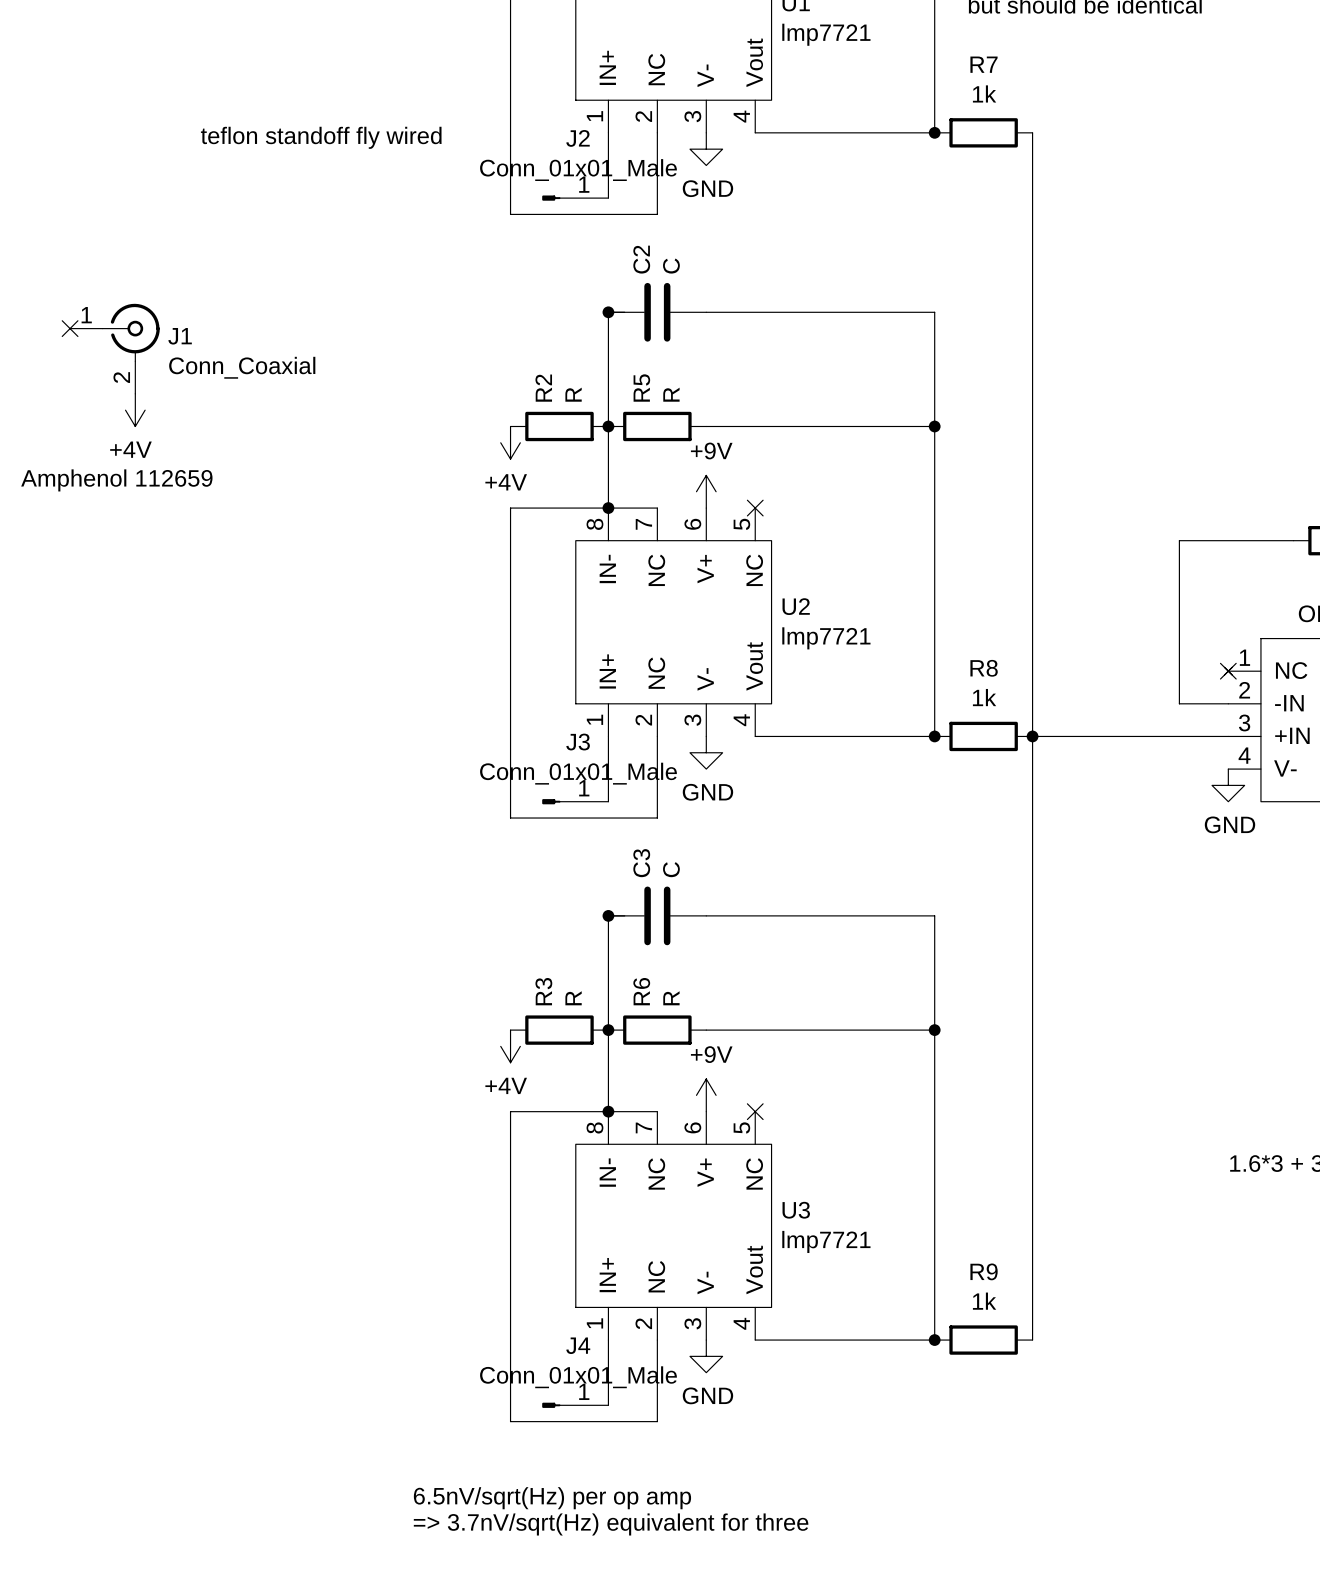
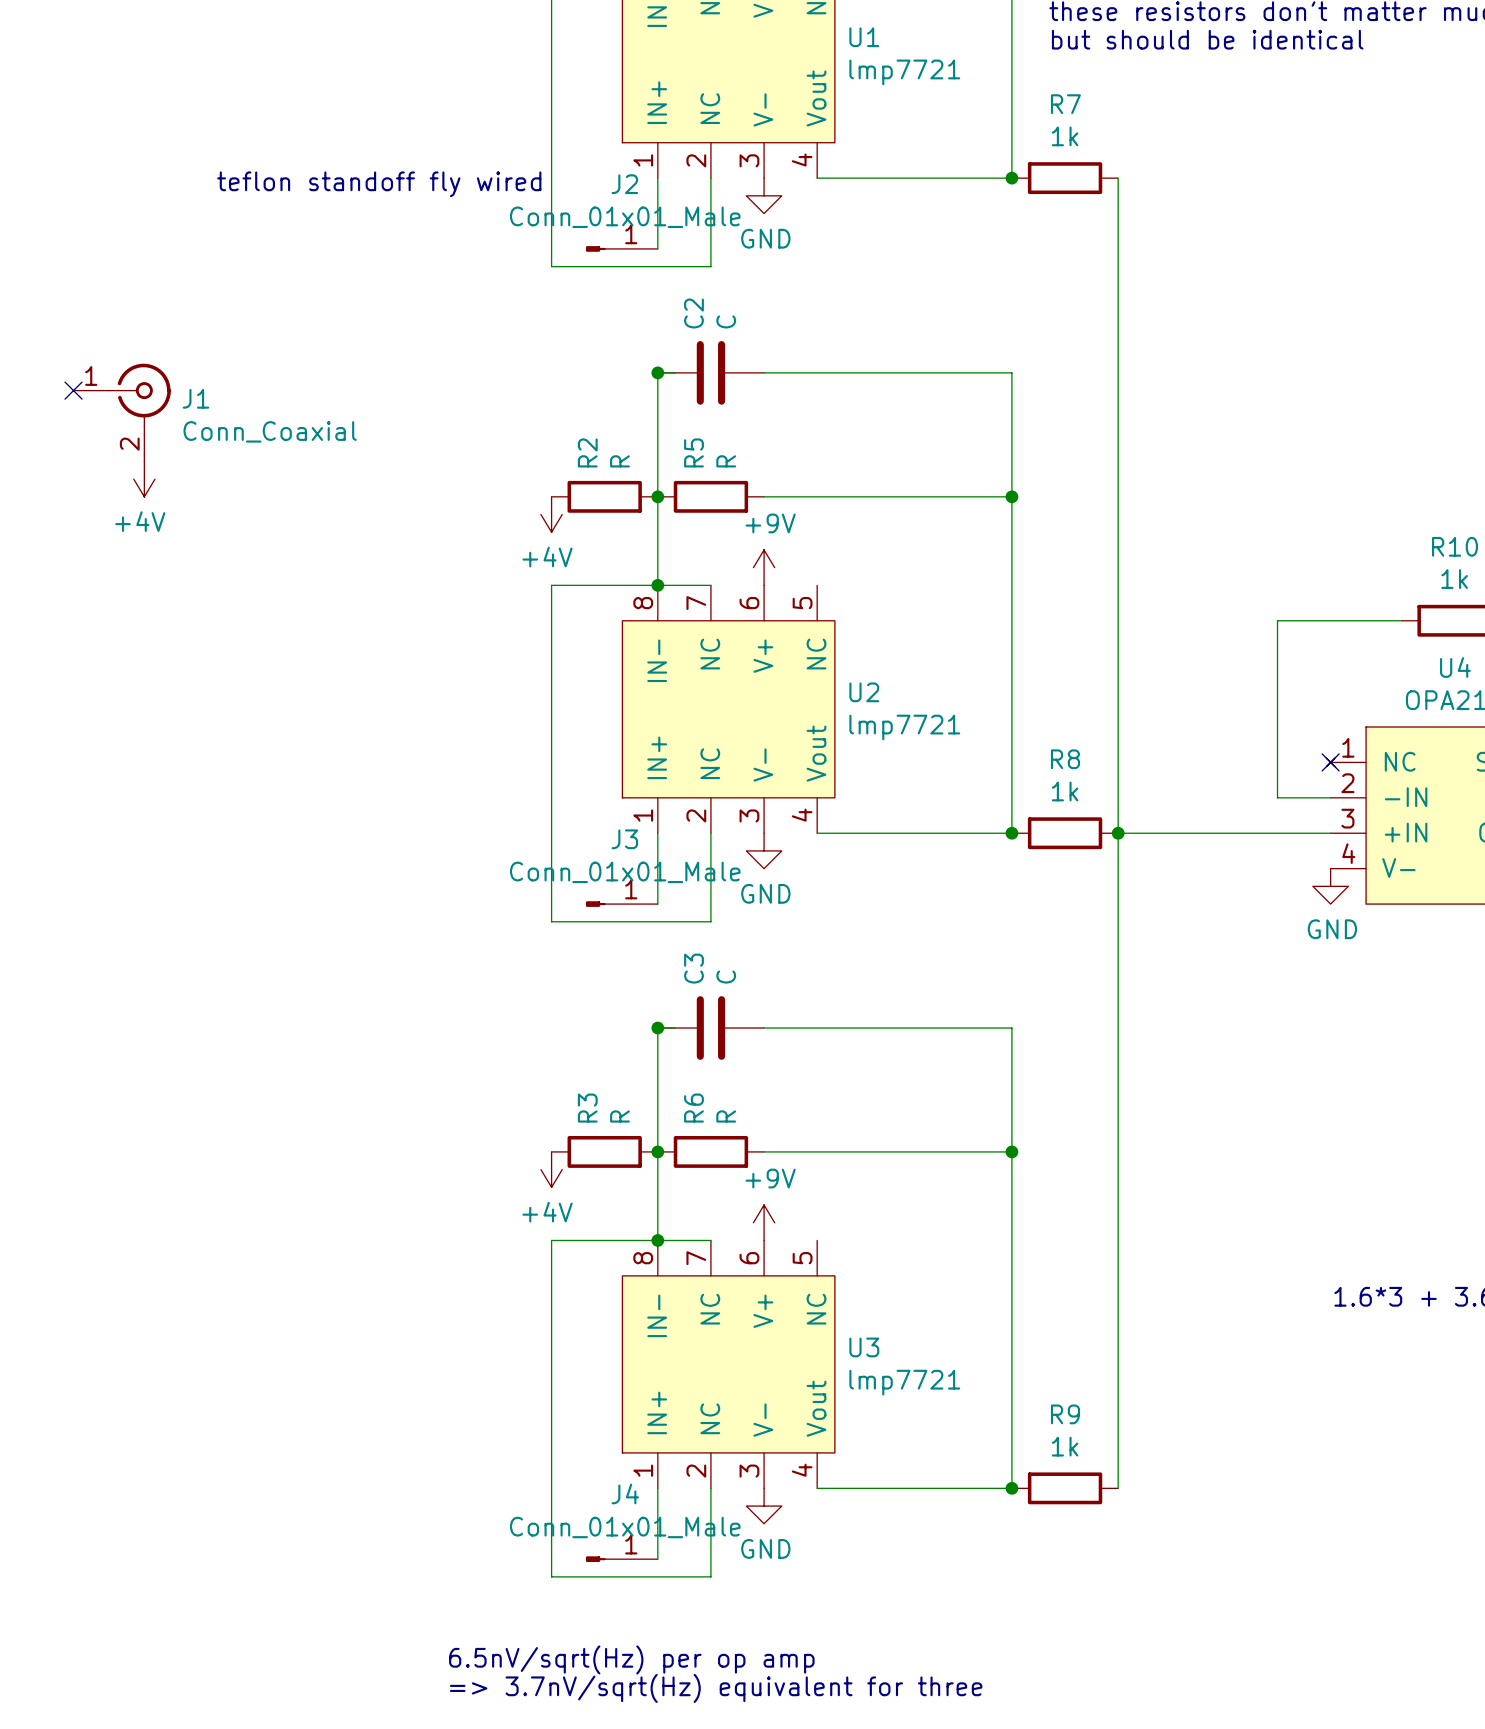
text: Amphenol 112659 (116, 480) -> none
no-connect mark: (755, 508) -> none
no-connect mark: (755, 1111) -> none

